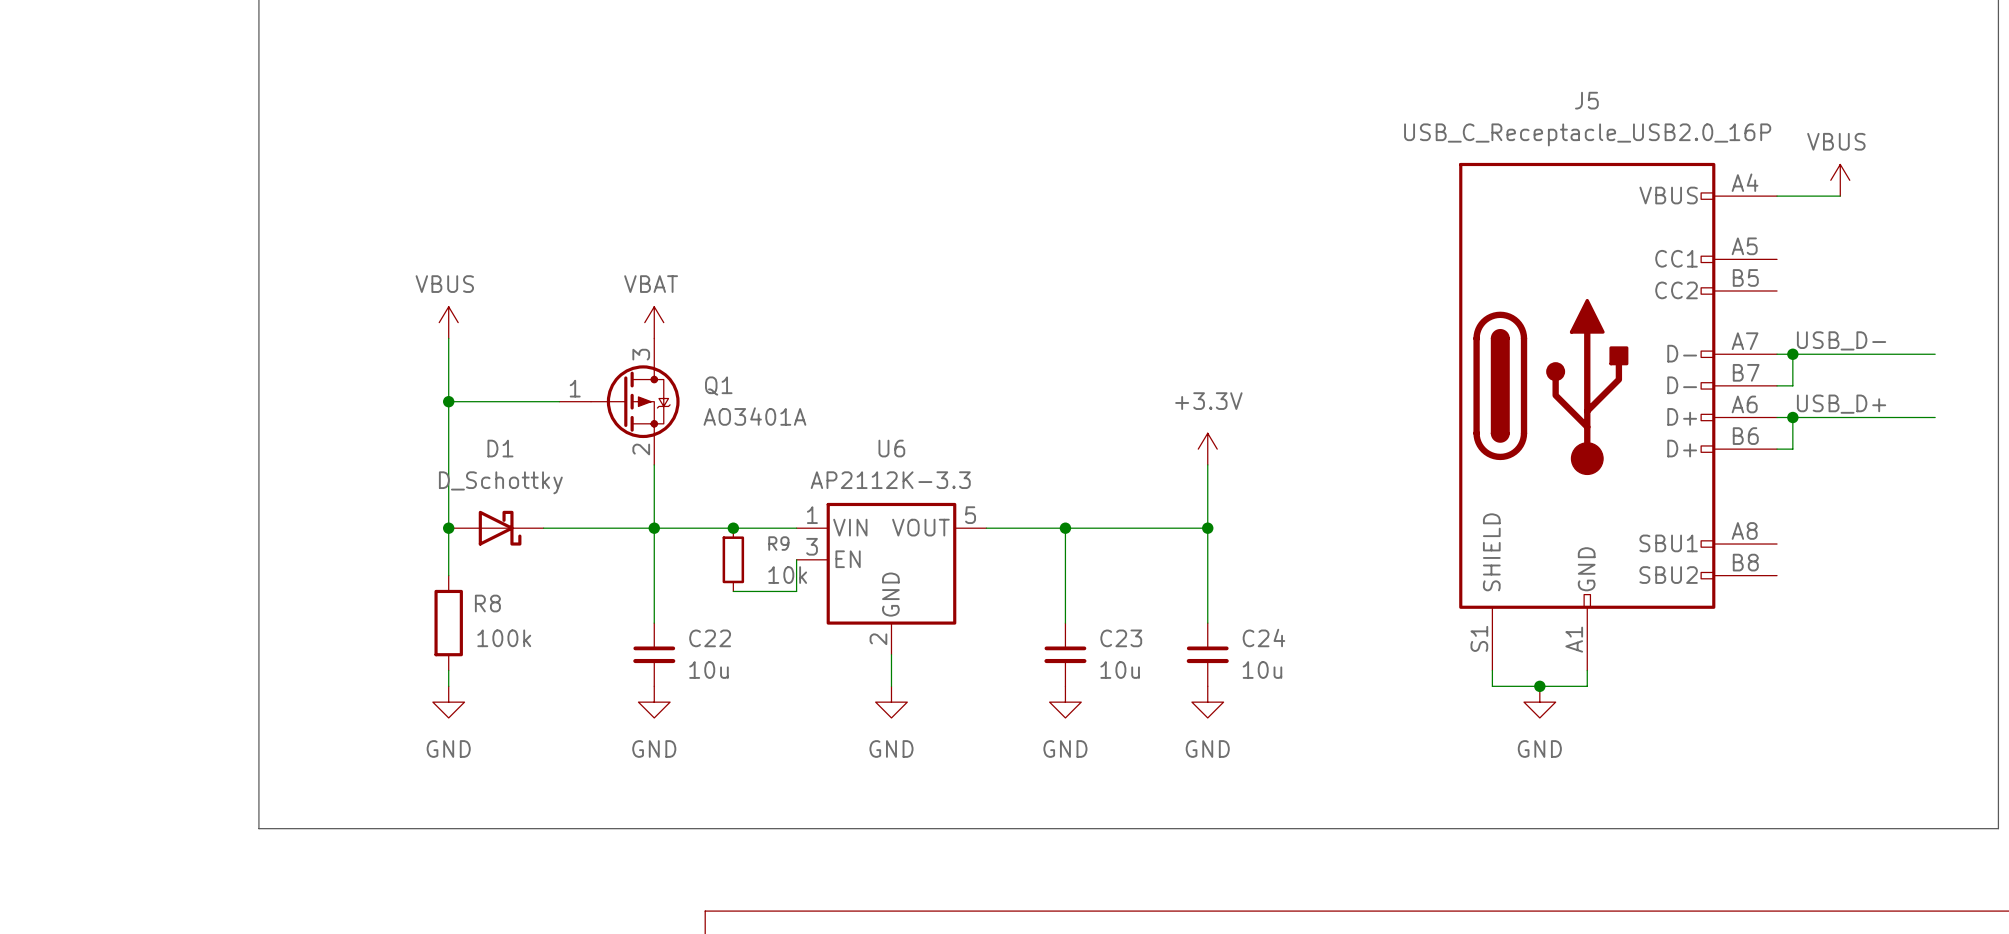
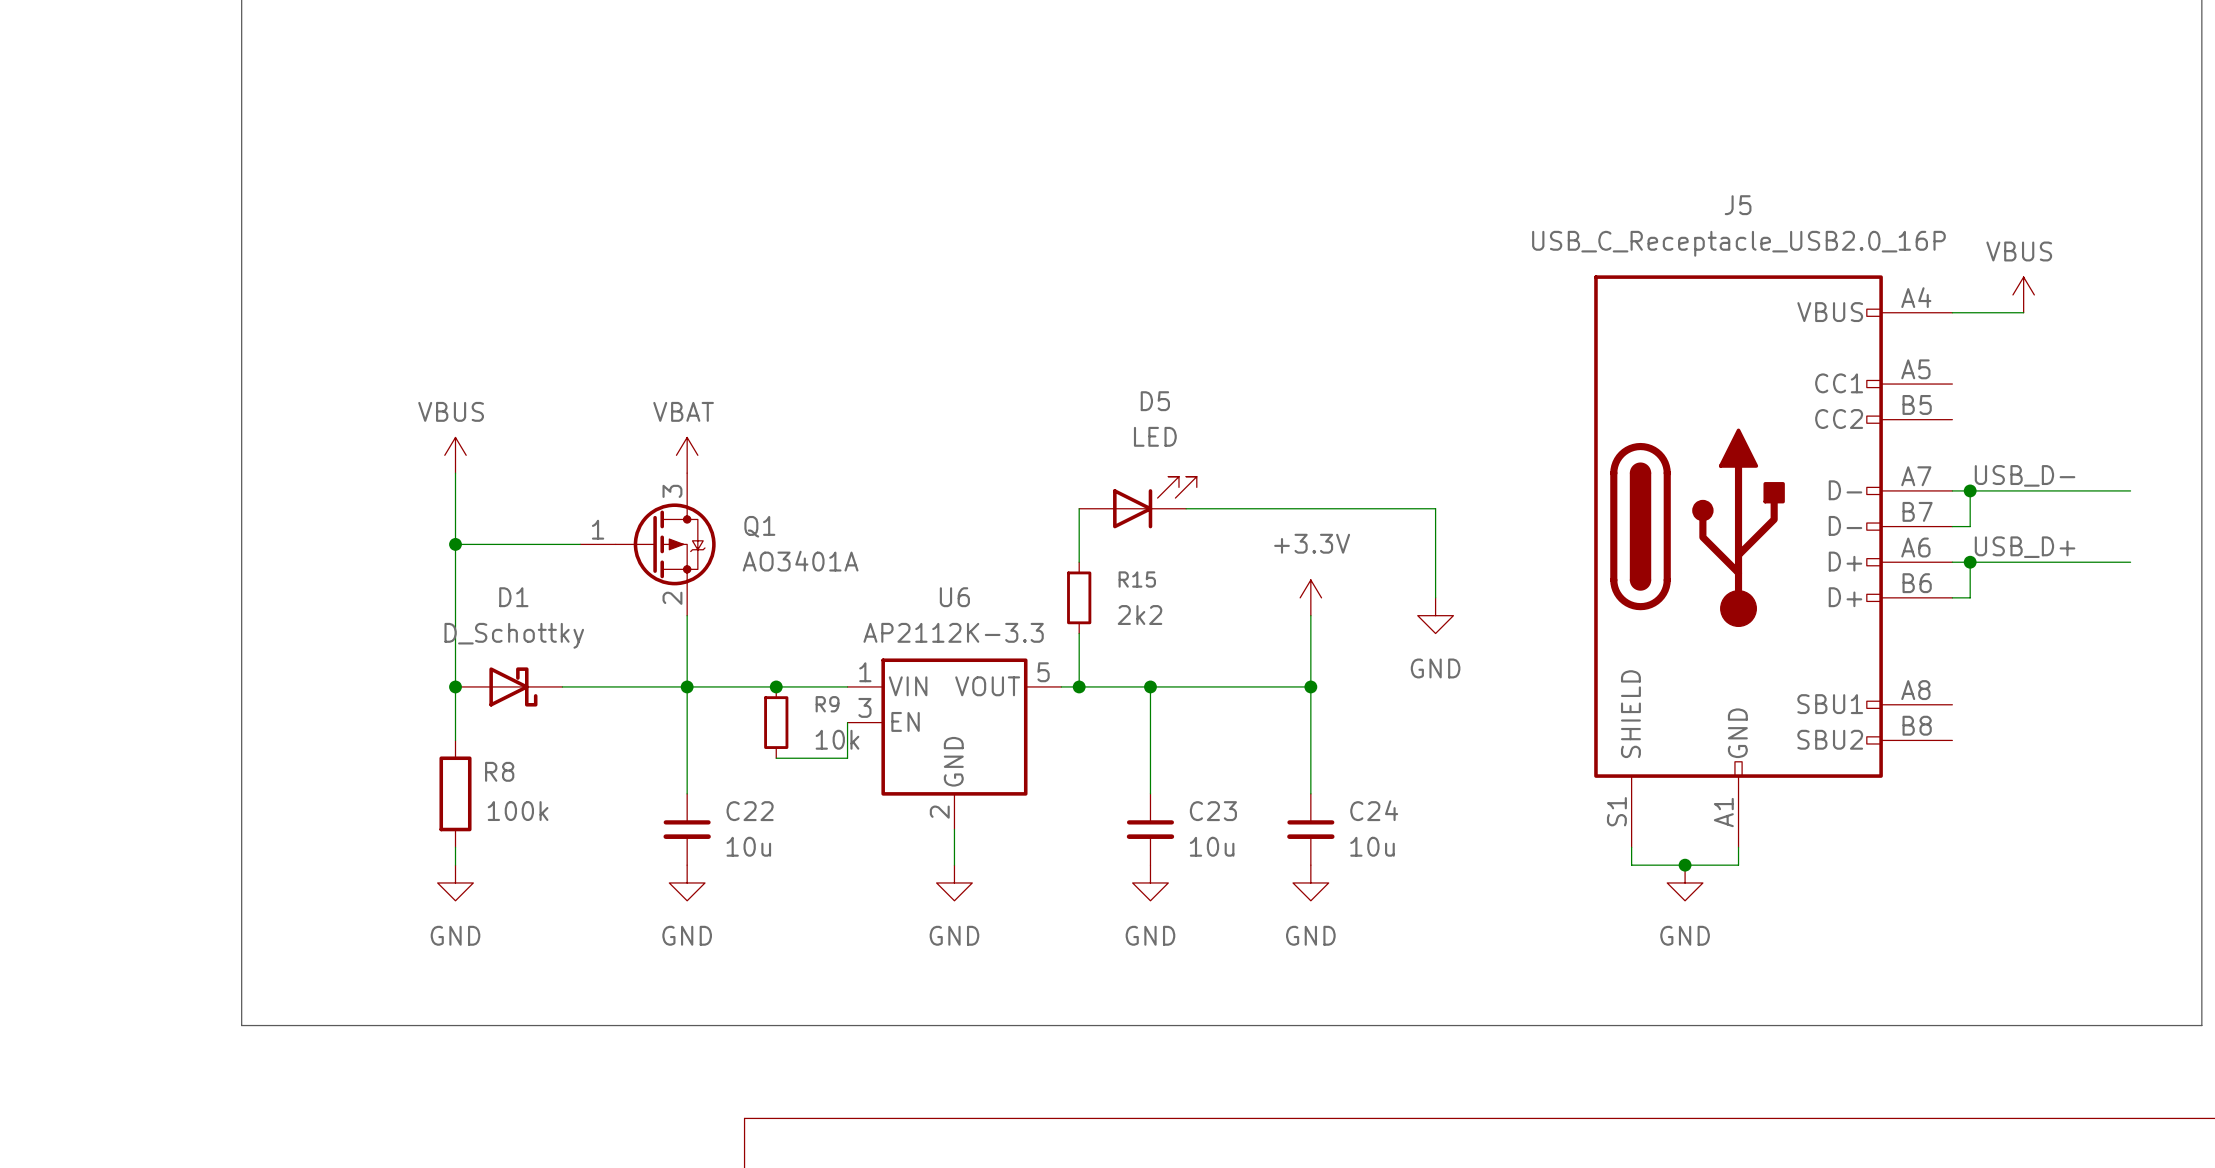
D5: none -> LED (1138, 502)
wire: none -> (1079, 508) (1079, 562)
wire: none -> (1186, 508) (1435, 508) (1435, 597)
R15: none -> 2k2 (1079, 597)
power symbol: none -> GND (1435, 615)
wire: none -> (1079, 633) (1079, 686)
junction: none -> (1079, 686)

